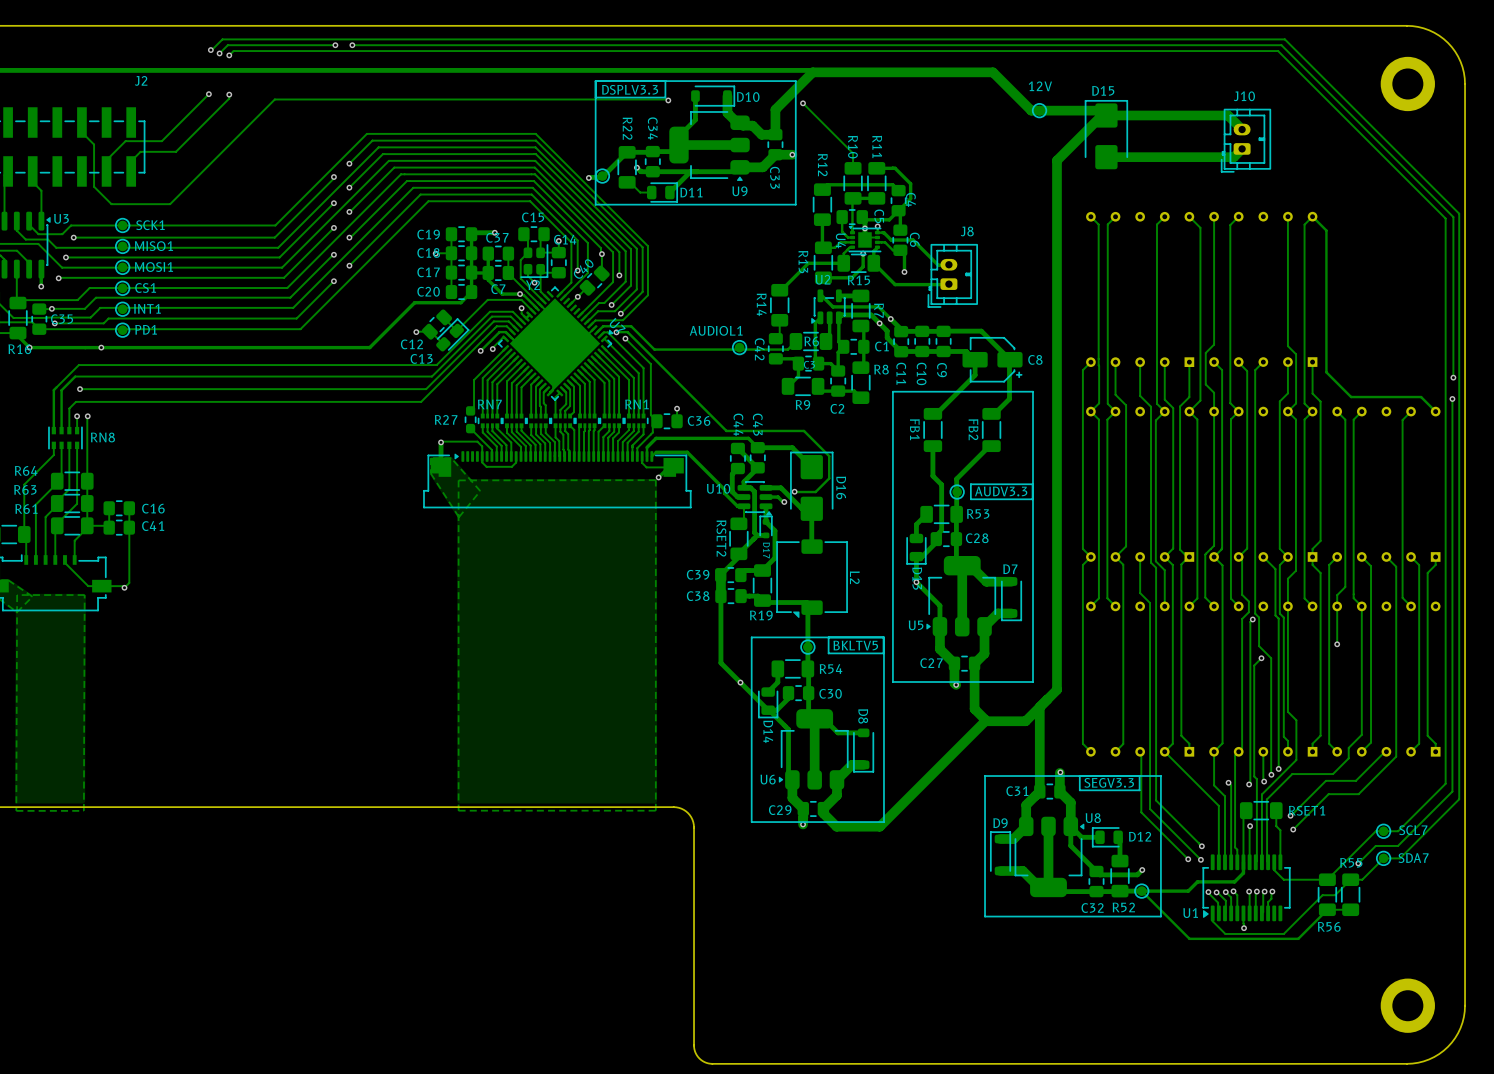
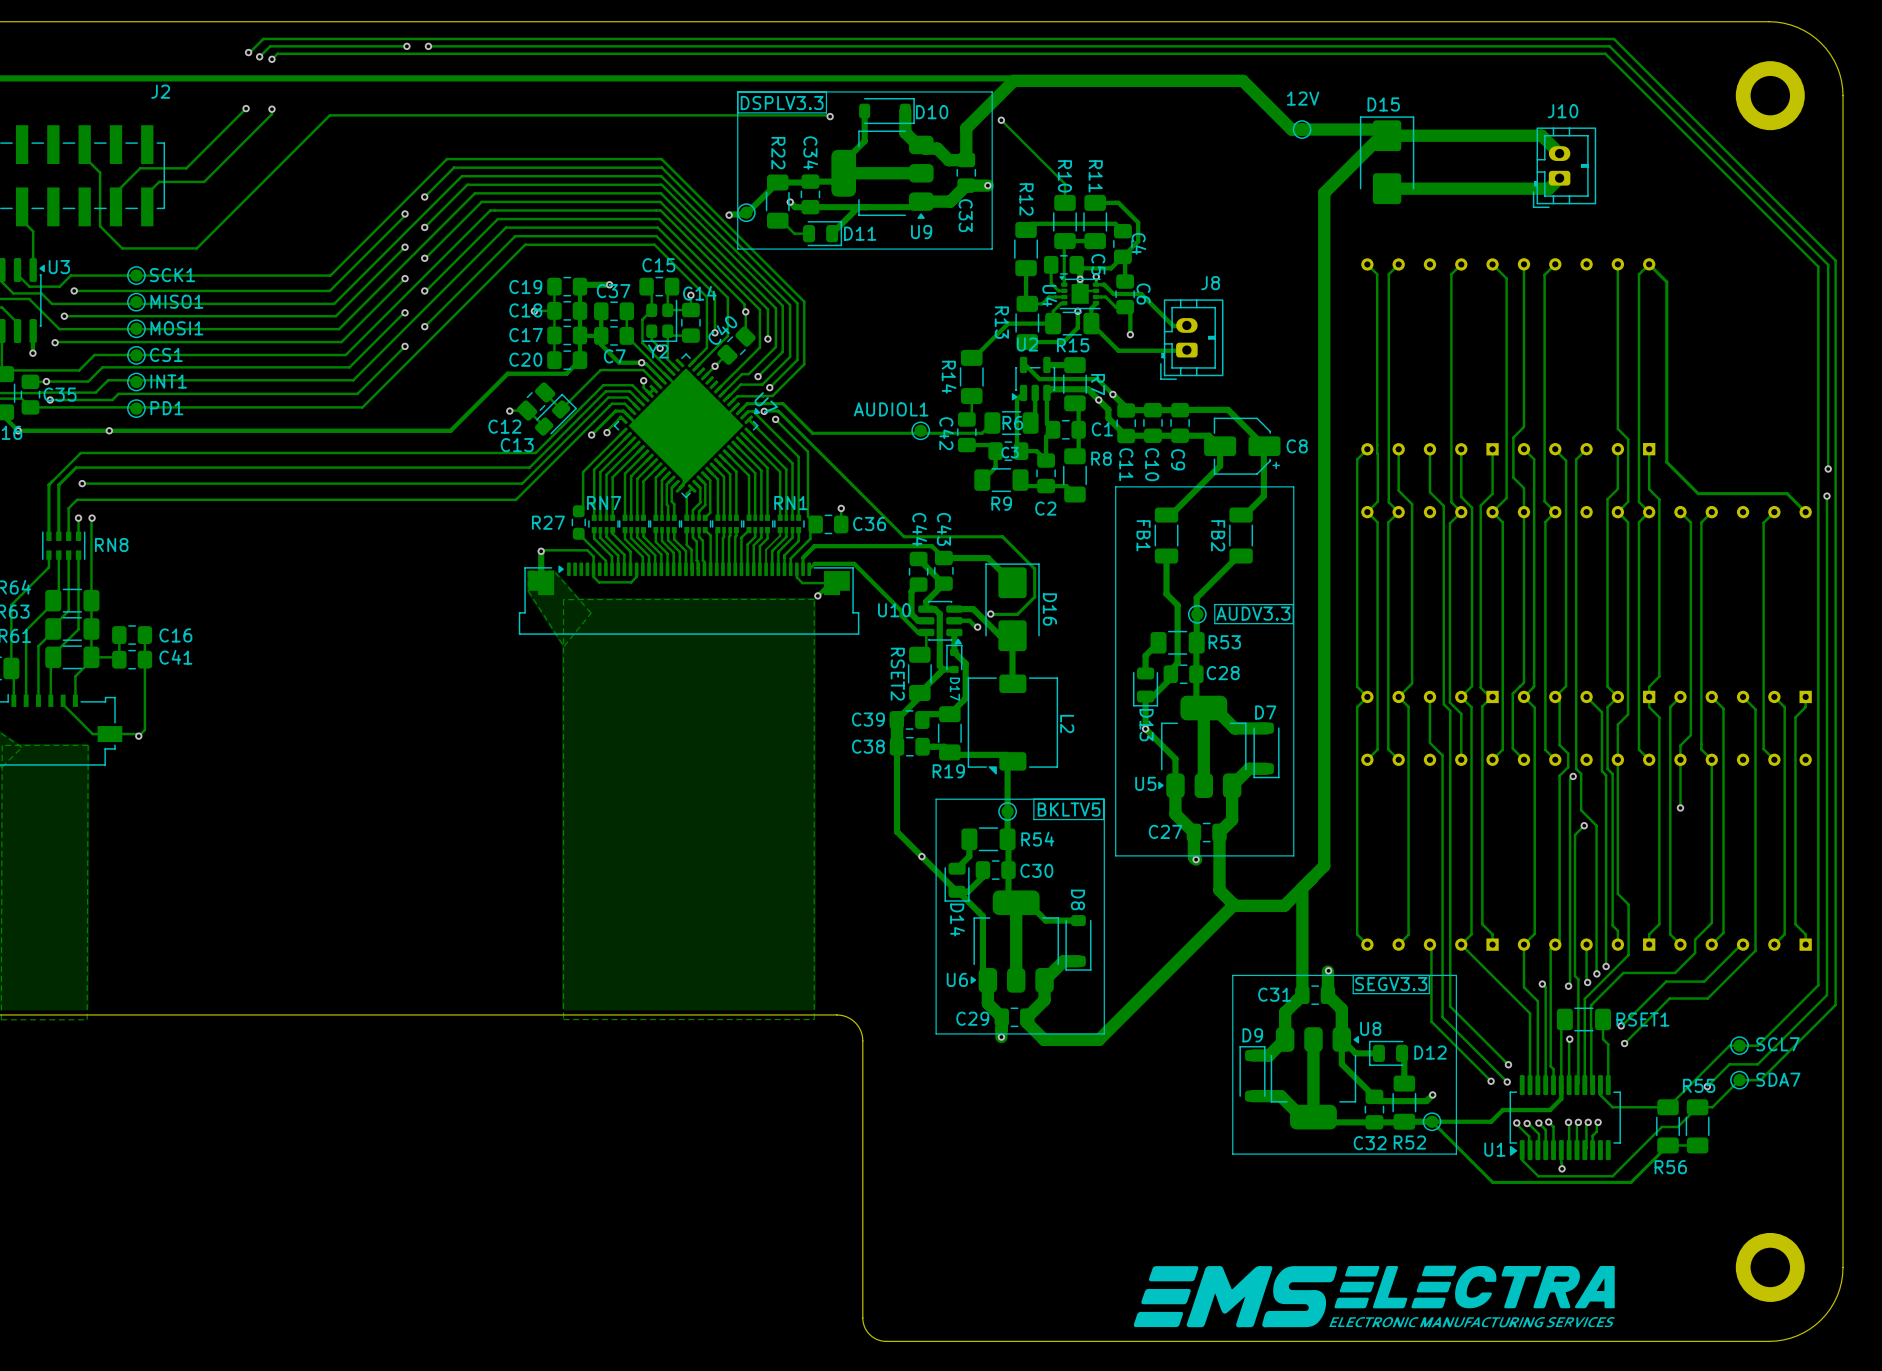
drawing: none -> [1133, 1265, 1615, 1328]

